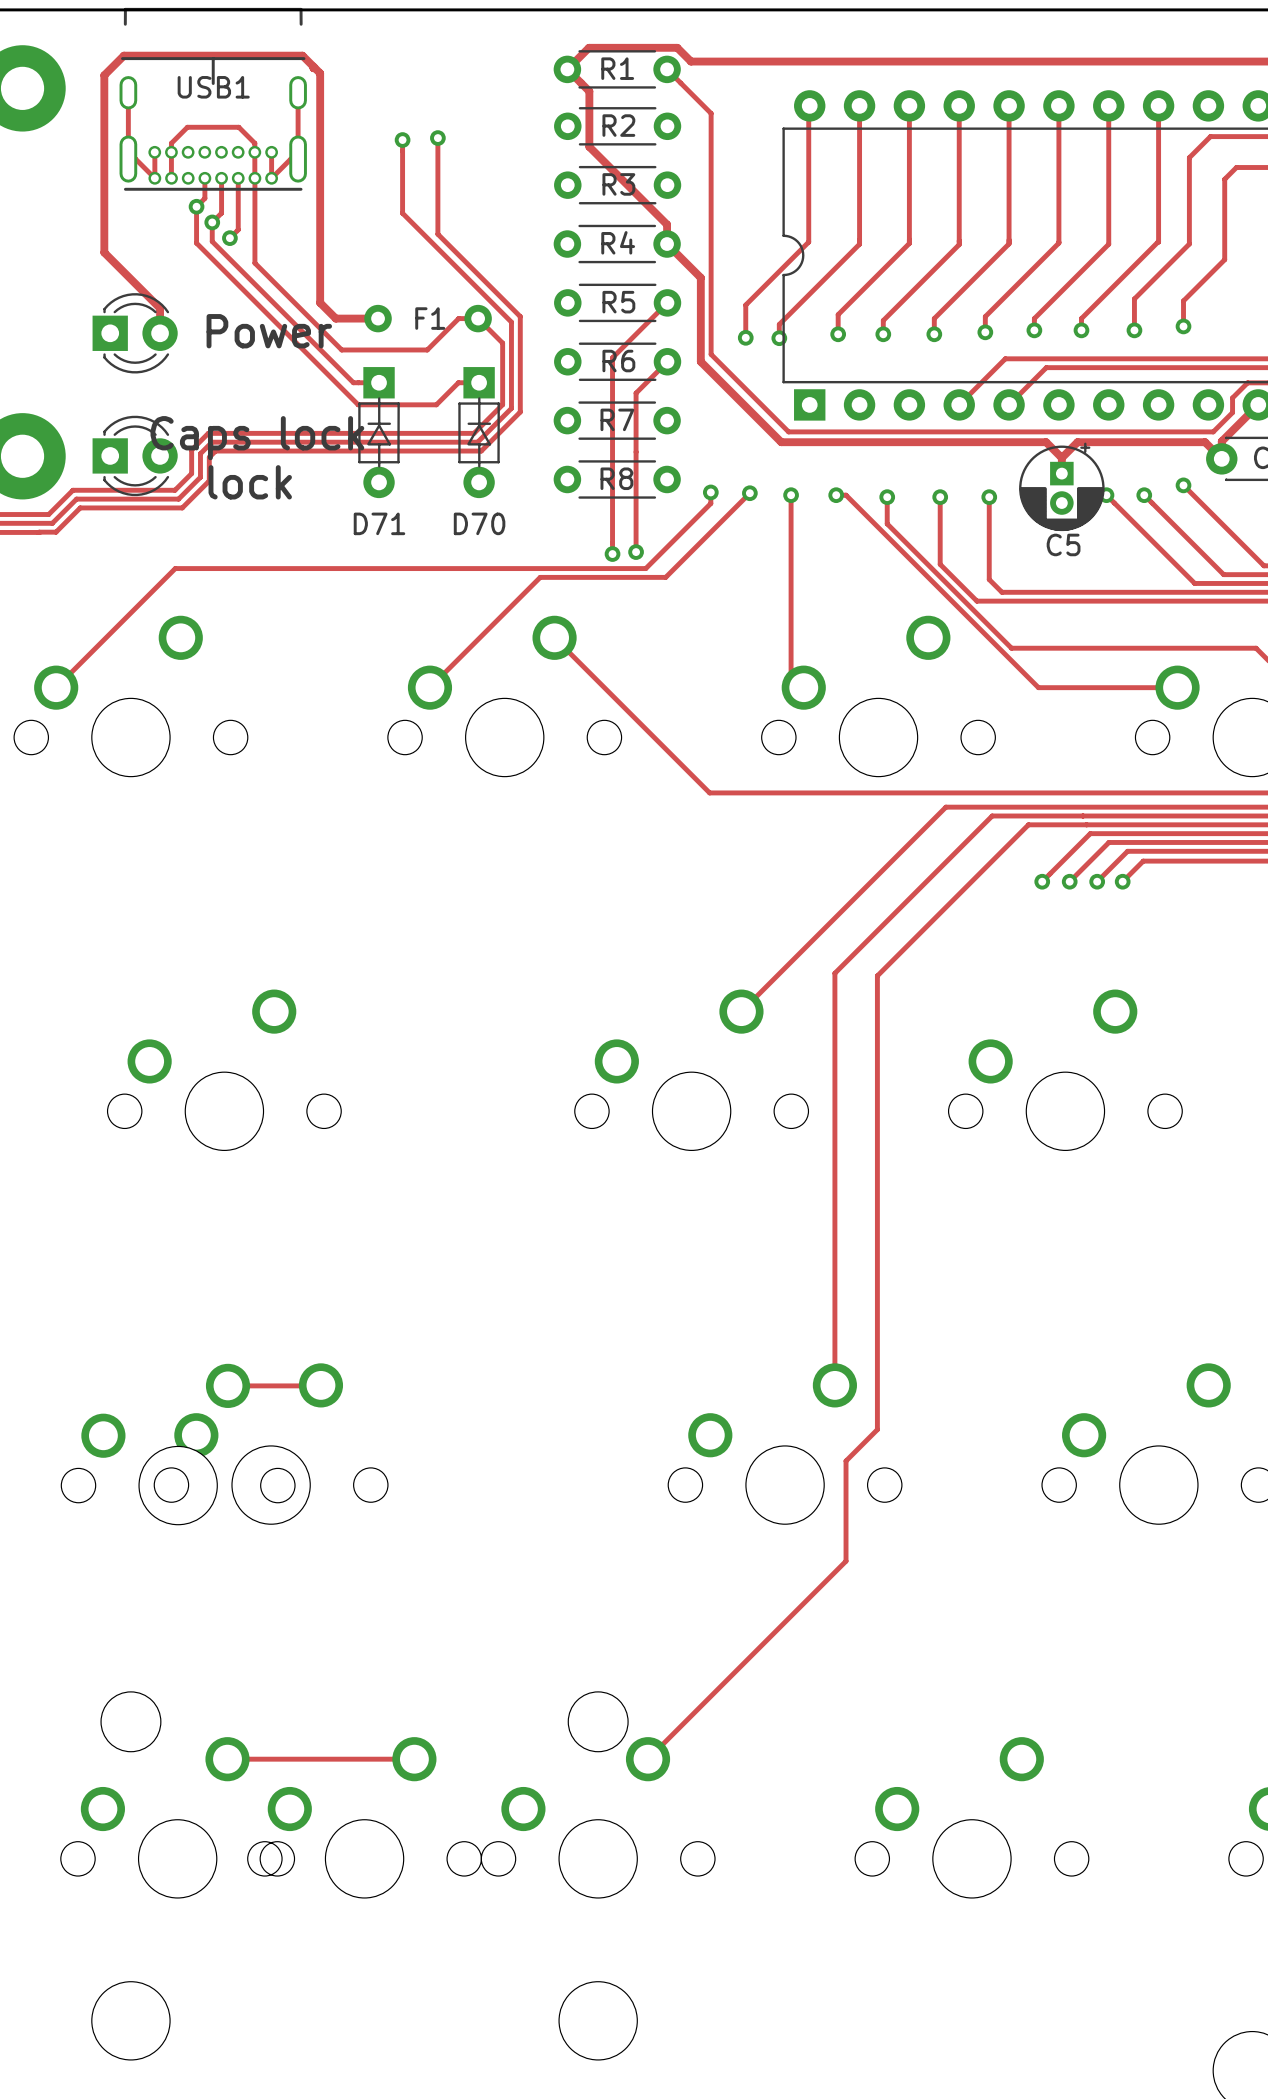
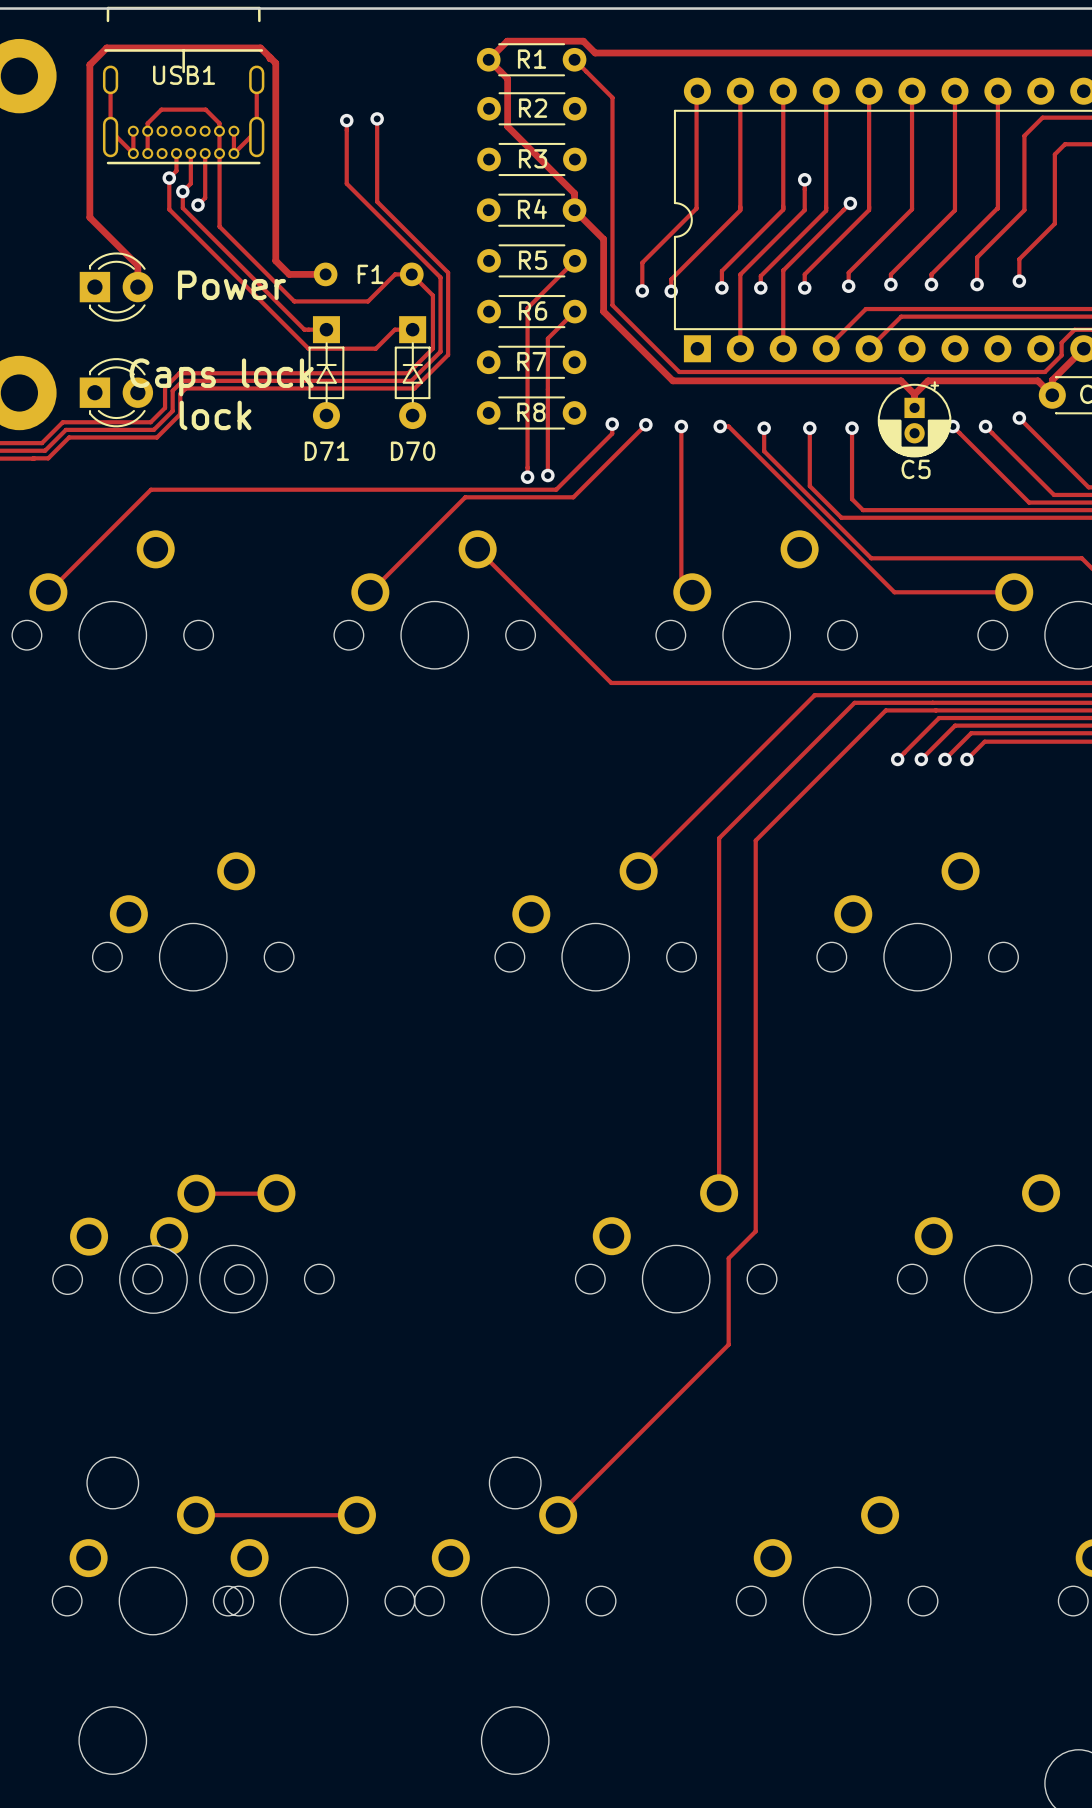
track: none -> (804, 179) (804, 210) (740, 274) (740, 348)
via: none -> (804, 179)
track: none -> (850, 203) (783, 270) (783, 348)
via: none -> (850, 203)

